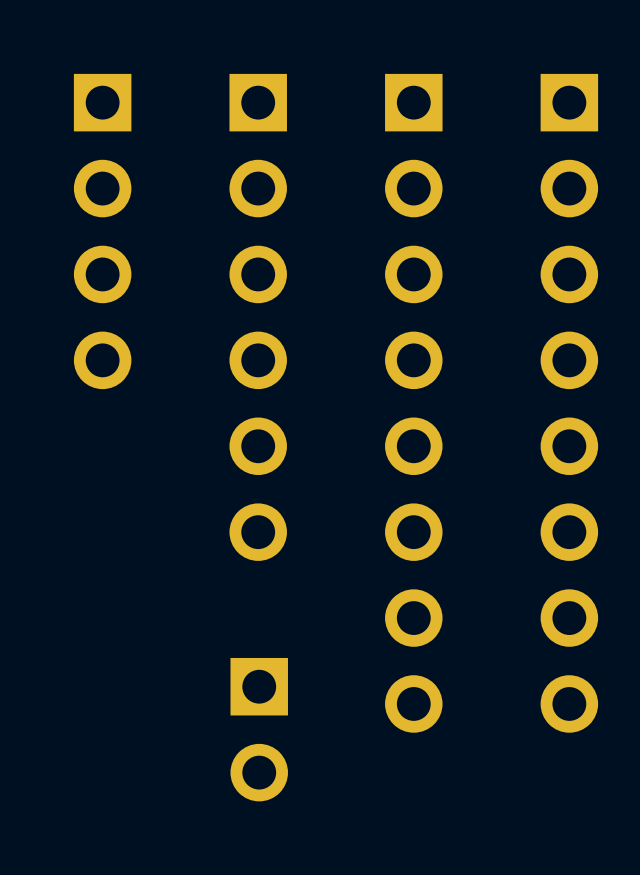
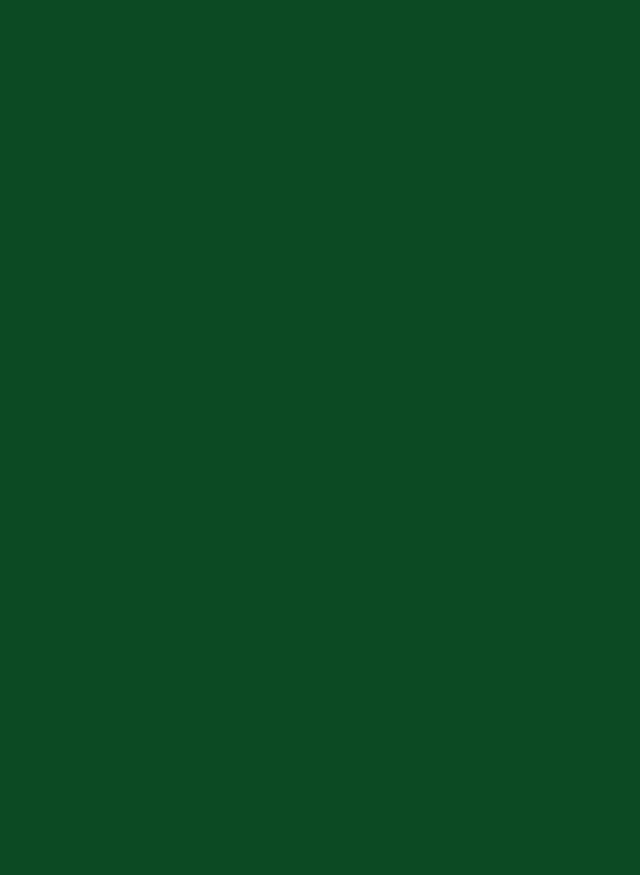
part: (102, 231) -> none
part: (258, 317) -> none
part: (413, 403) -> none
part: (569, 403) -> none
part: (259, 729) -> none

